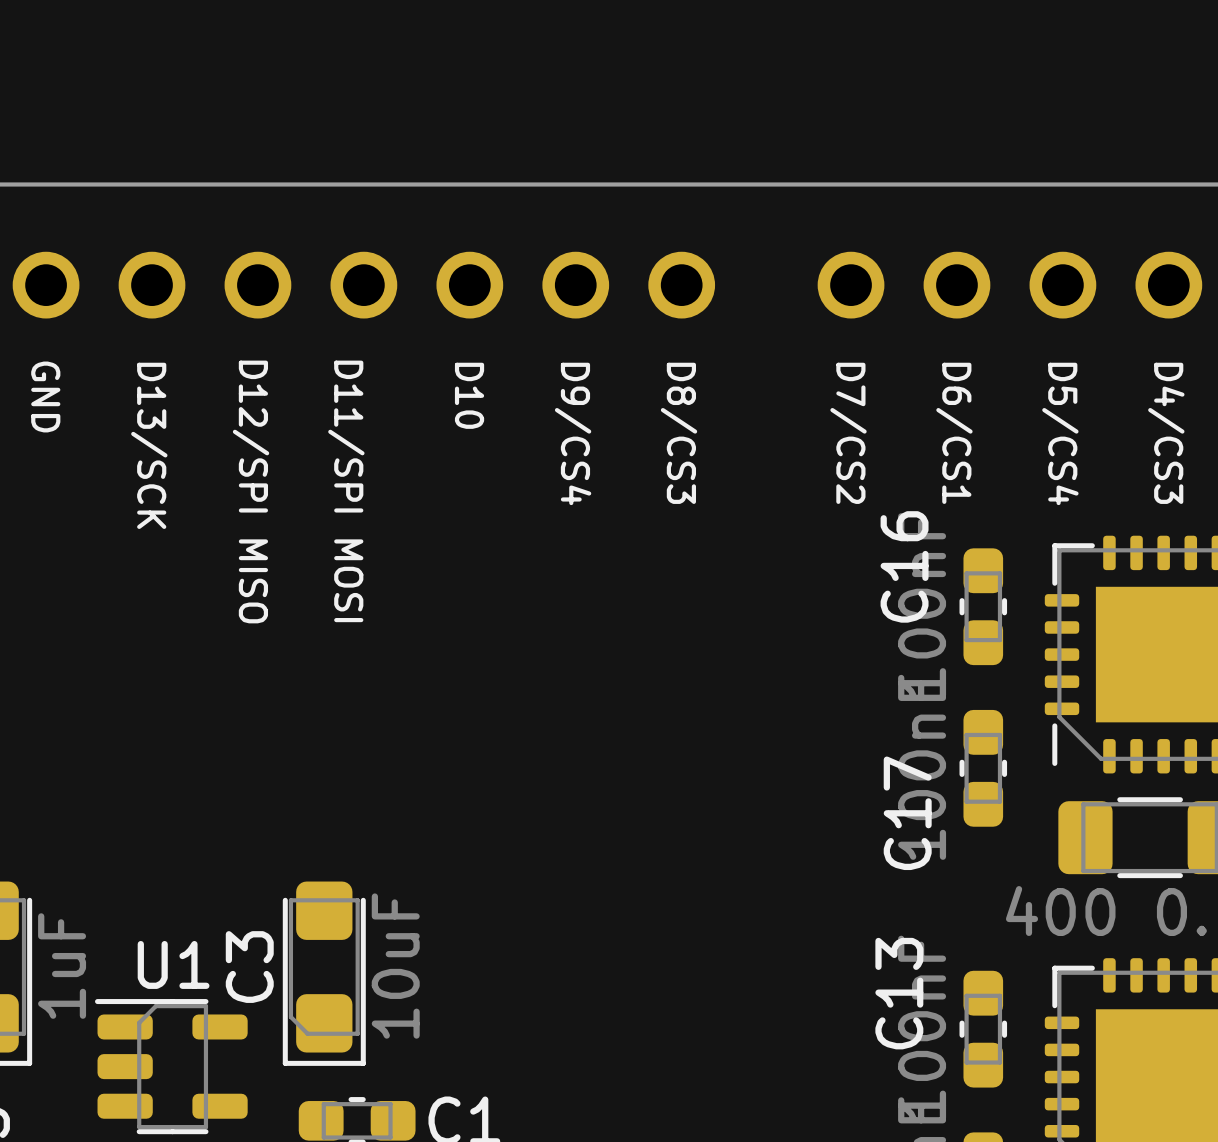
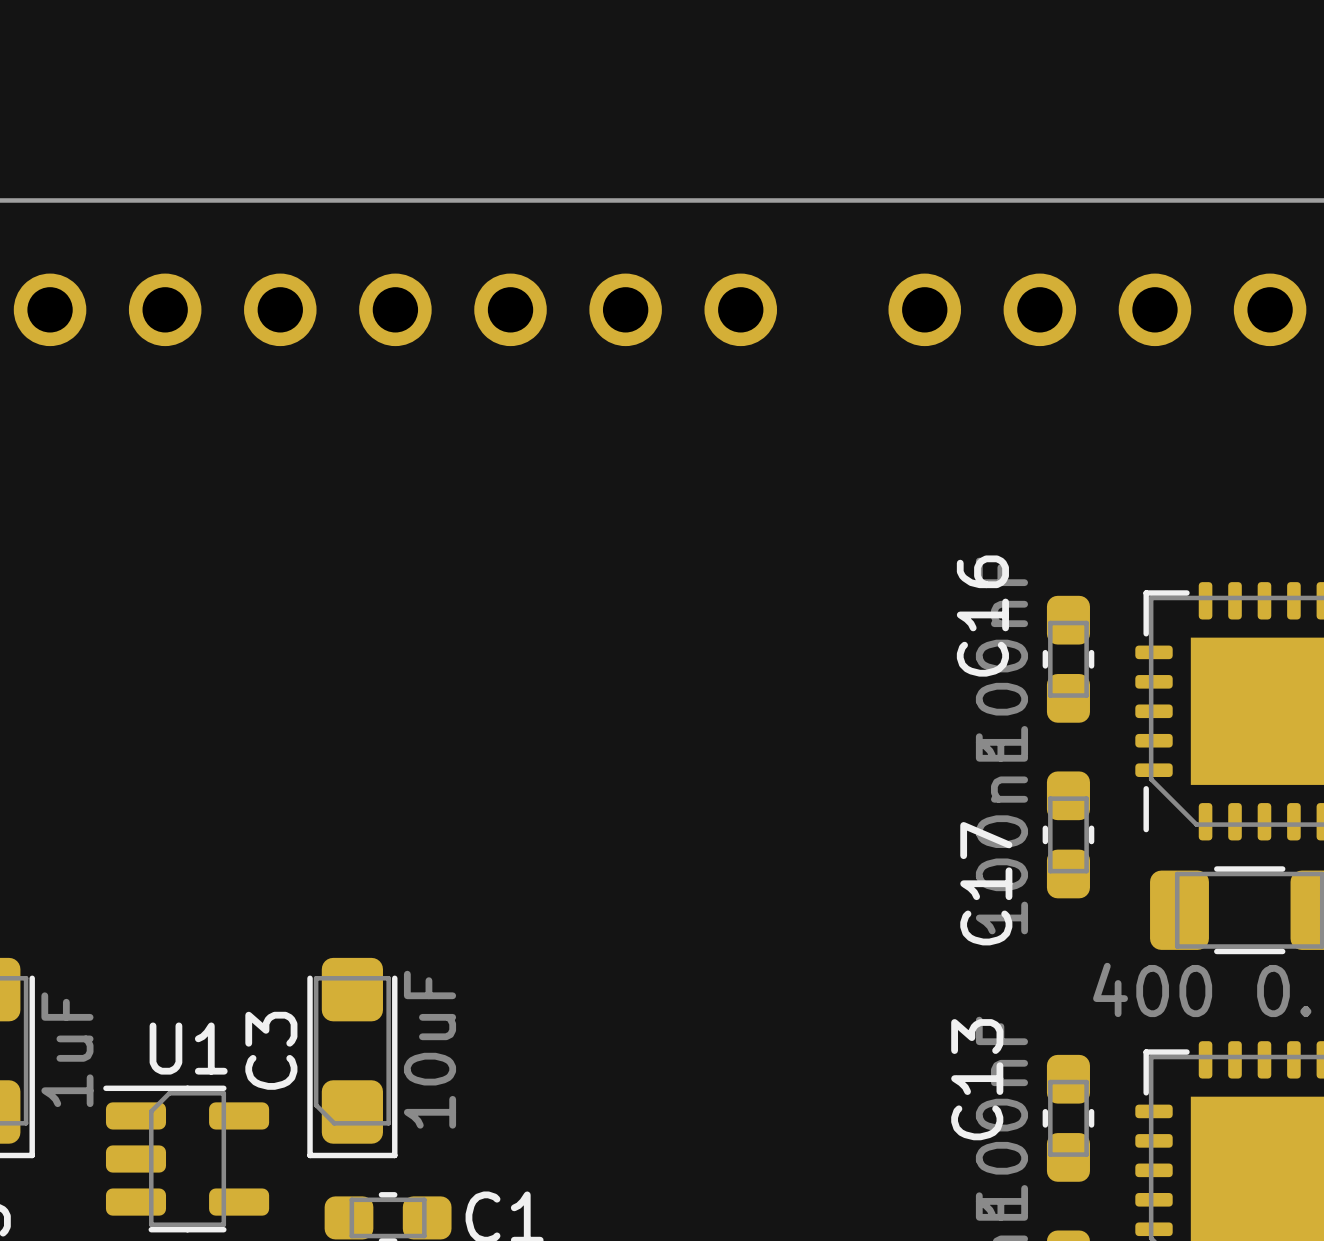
text: D10 (469, 395) -> none
text: GND (45, 396) -> none
text: D9/CS4 (573, 433) -> none
text: D8/CS3 (679, 433) -> none
text: D7/CS2 (848, 433) -> none
text: D6/CS1 (954, 433) -> none
text: D5/CS4 (1060, 433) -> none
text: D4/CS3 (1166, 433) -> none
text: D13/SCK (149, 445) -> none
text: D12/SPI MISO (251, 491) -> none
text: D11/SPI MOSI (346, 491) -> none

